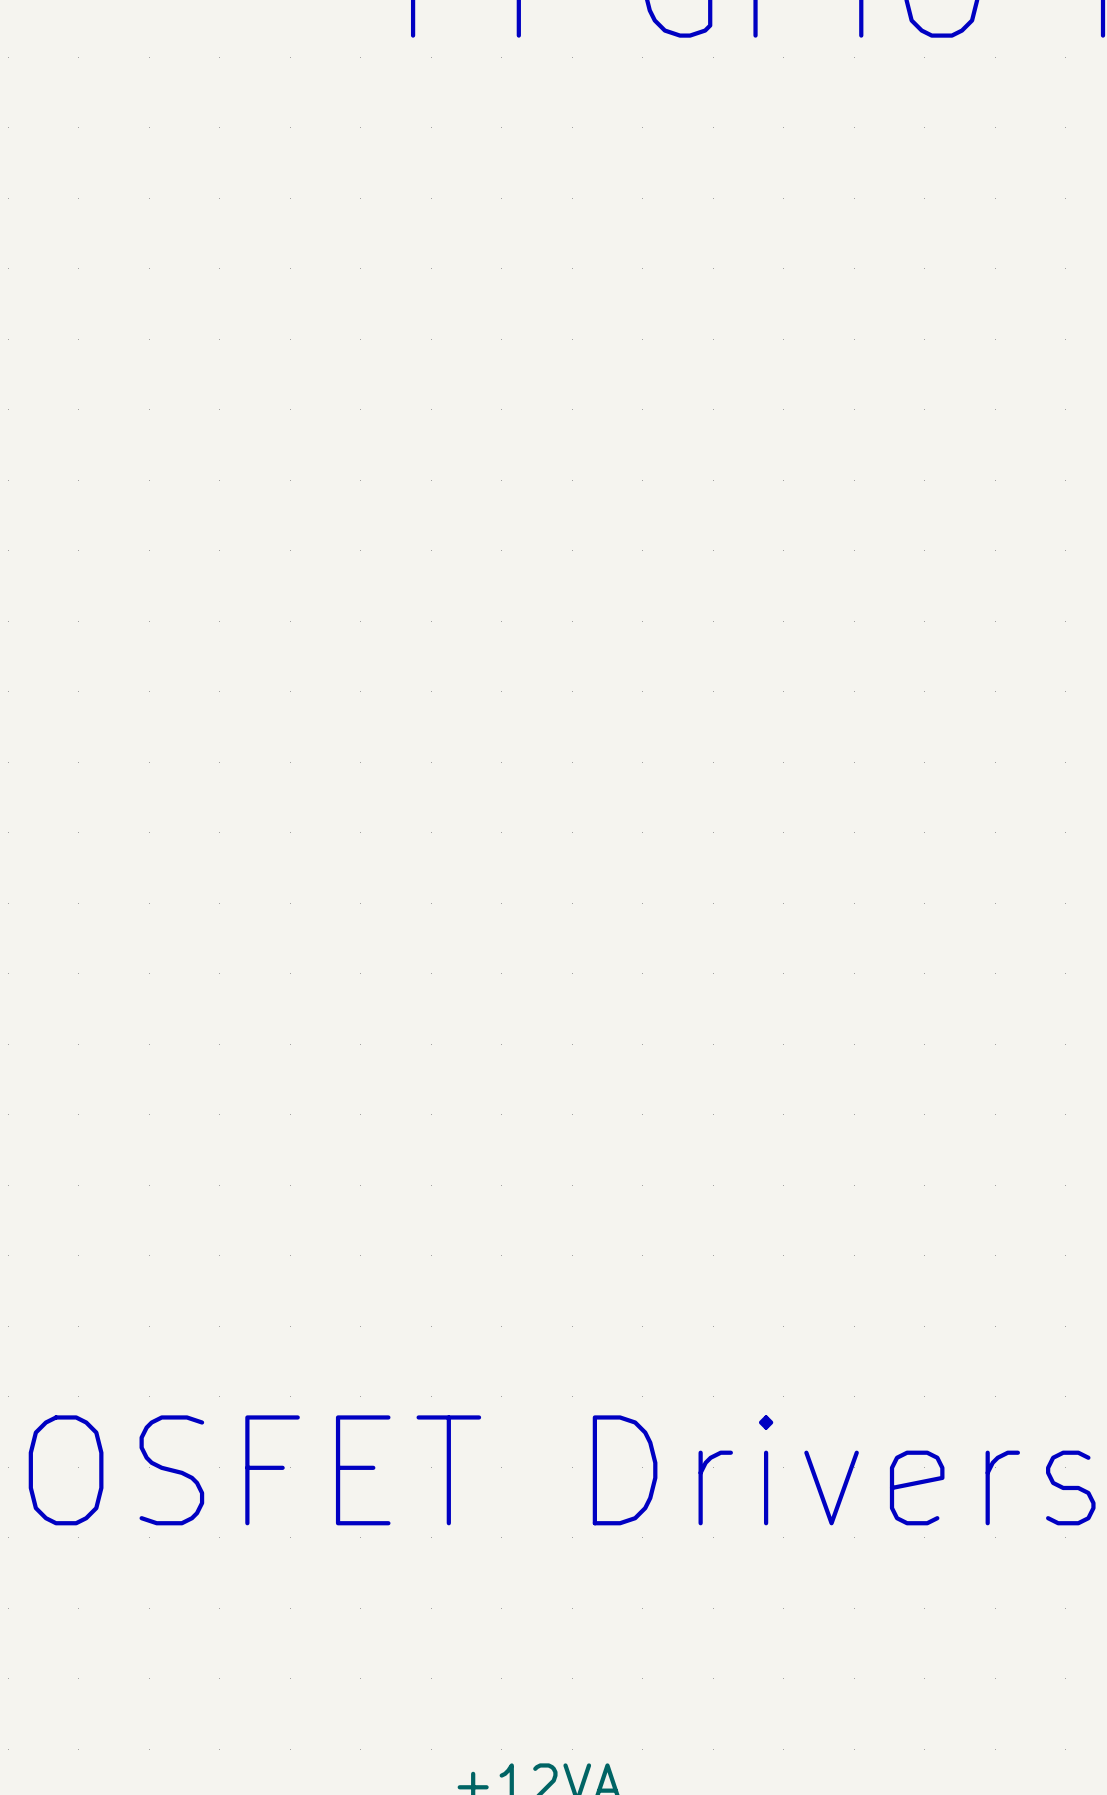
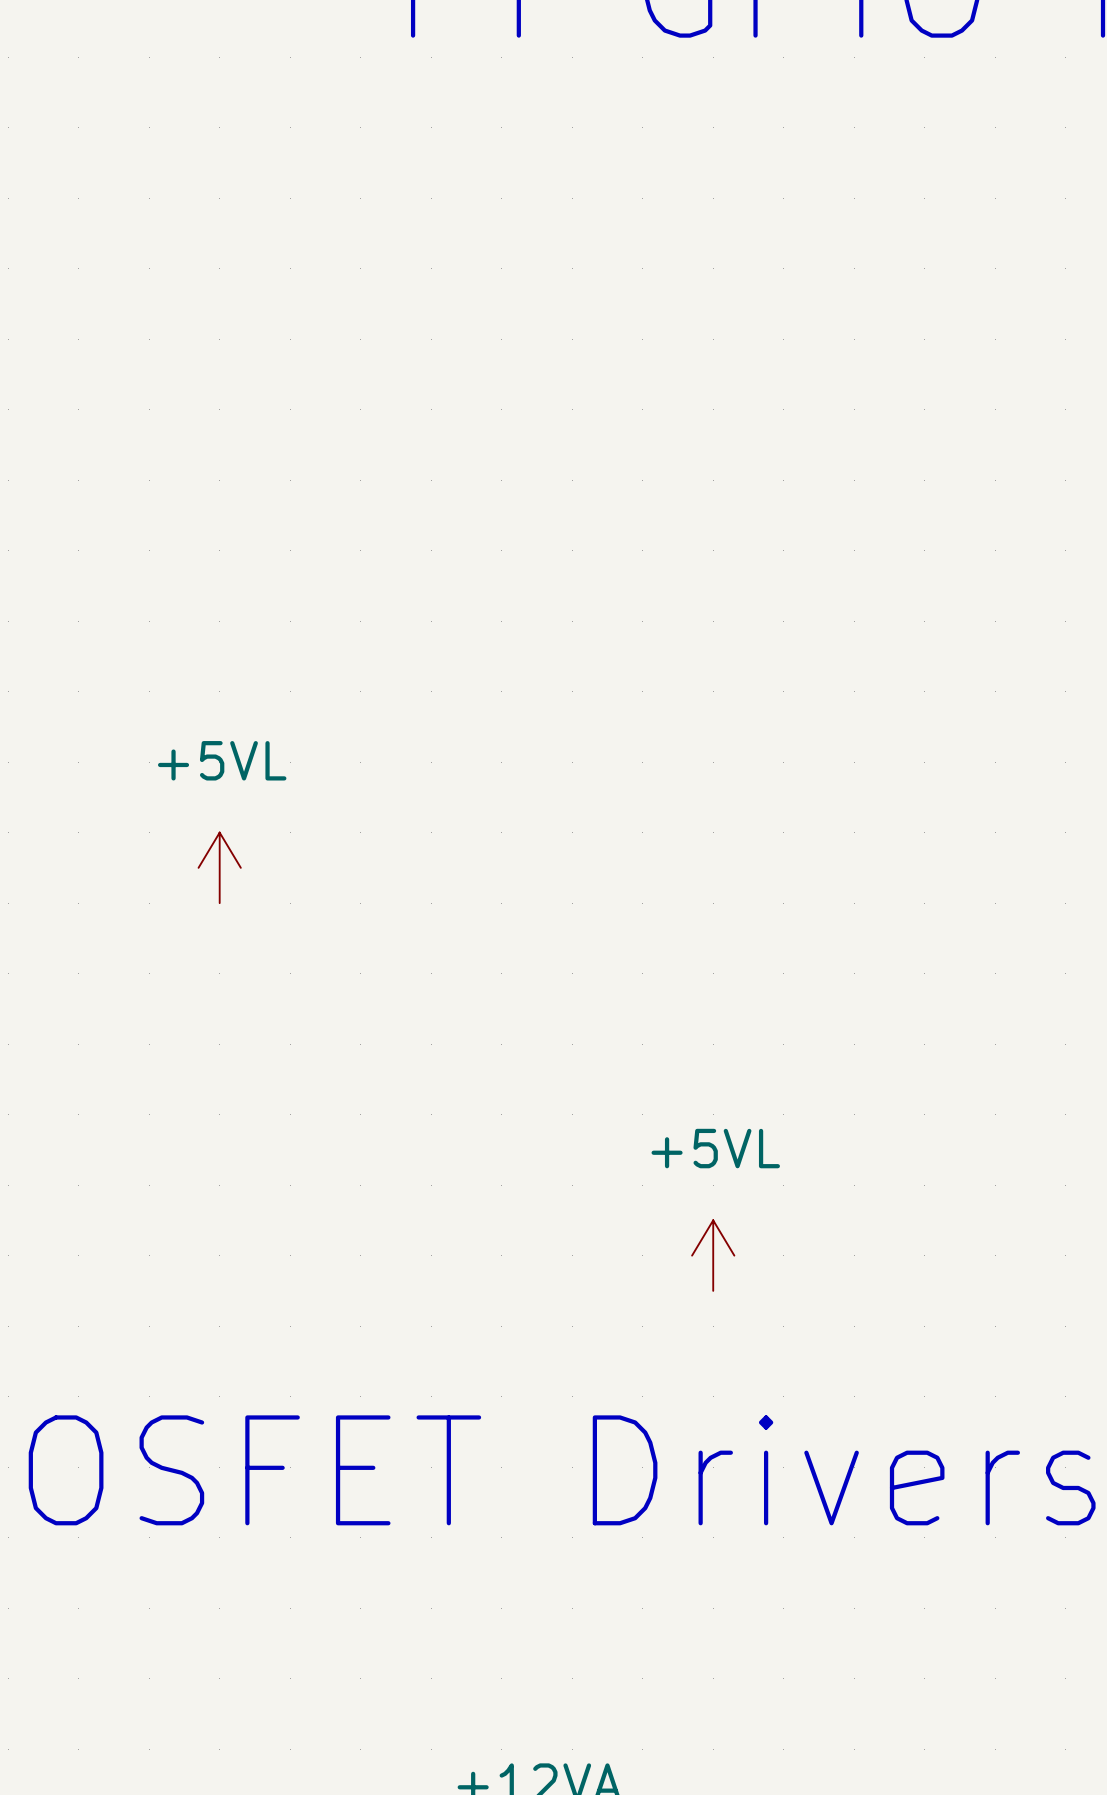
power symbol: none -> +5VL (219, 867)
power symbol: none -> +5VL (713, 1255)

